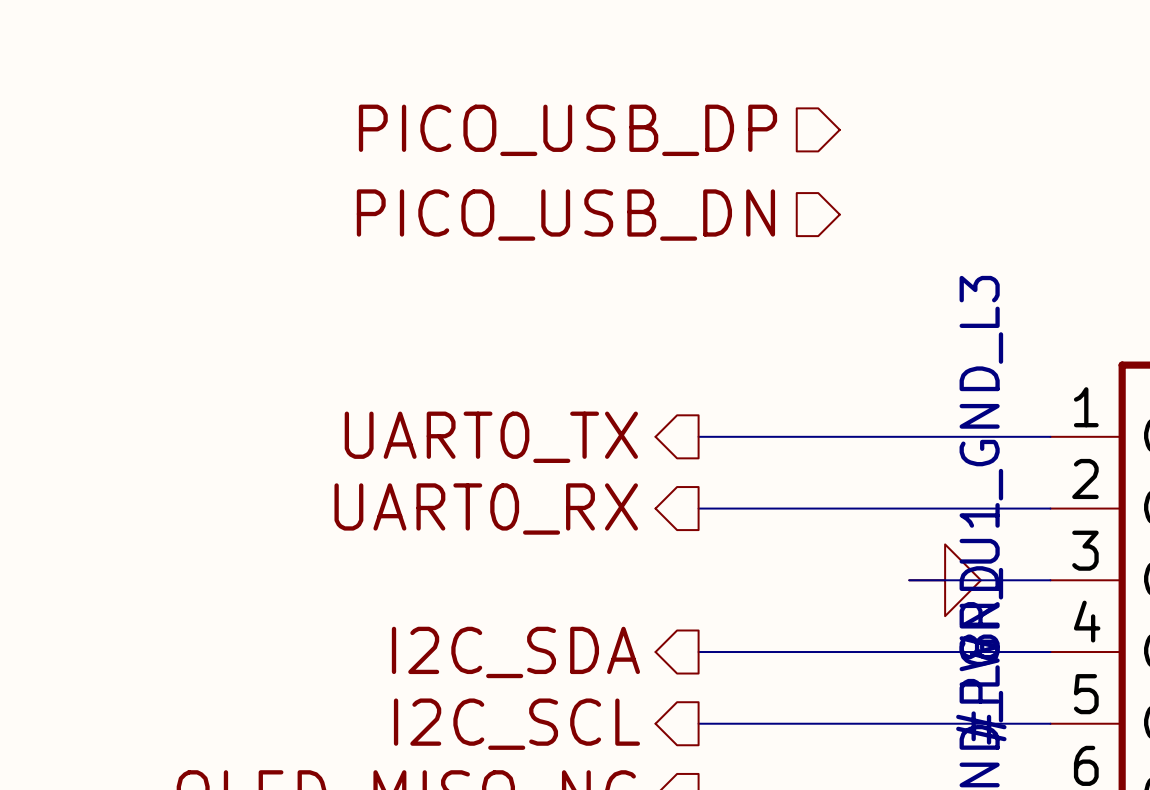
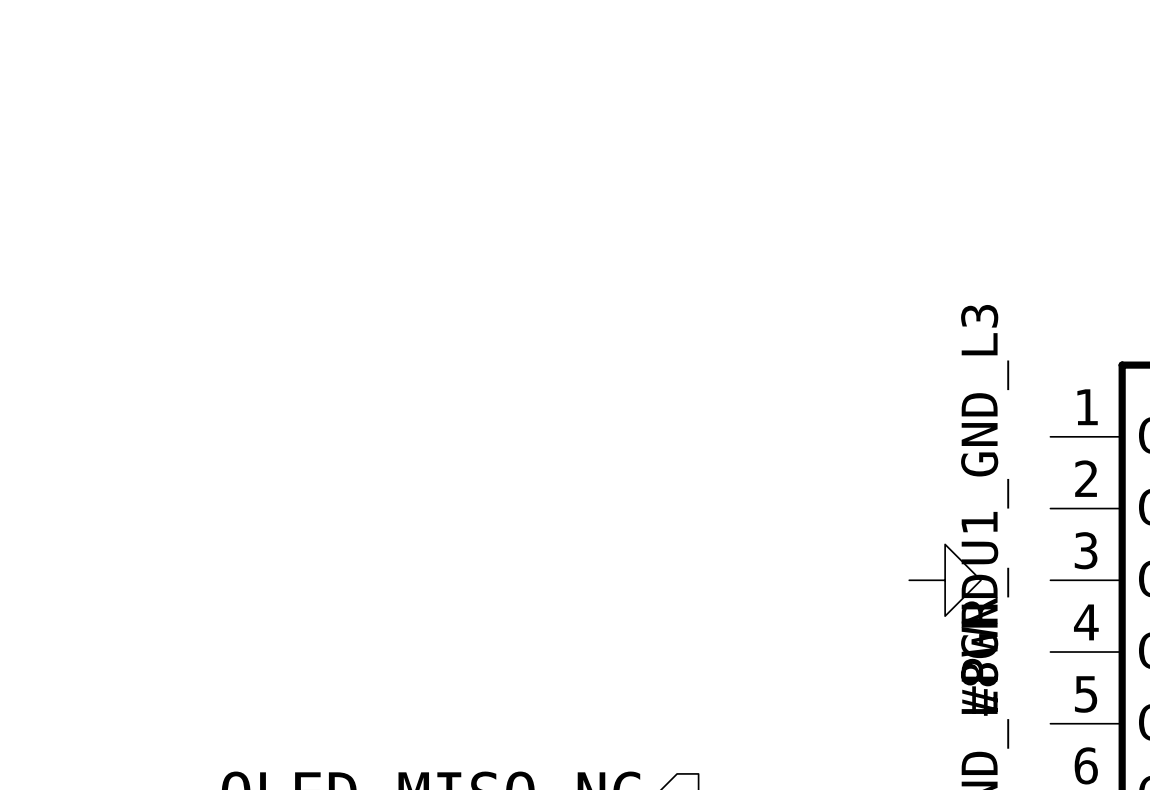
hierarchical label: PICO_USB_DP (567, 130) -> none
hierarchical label: PICO_USB_DN (565, 215) -> none
wire: (698, 436) (1050, 436) -> none
hierarchical label: UART0_TX (491, 437) -> none
wire: (698, 508) (1050, 508) -> none
hierarchical label: UART0_RX (486, 509) -> none
wire: (909, 580) (1050, 580) -> none
hierarchical label: I2C_SDA (515, 652) -> none
wire: (698, 652) (1050, 652) -> none
wire: (698, 723) (1050, 723) -> none
hierarchical label: I2C_SCL (516, 724) -> none

